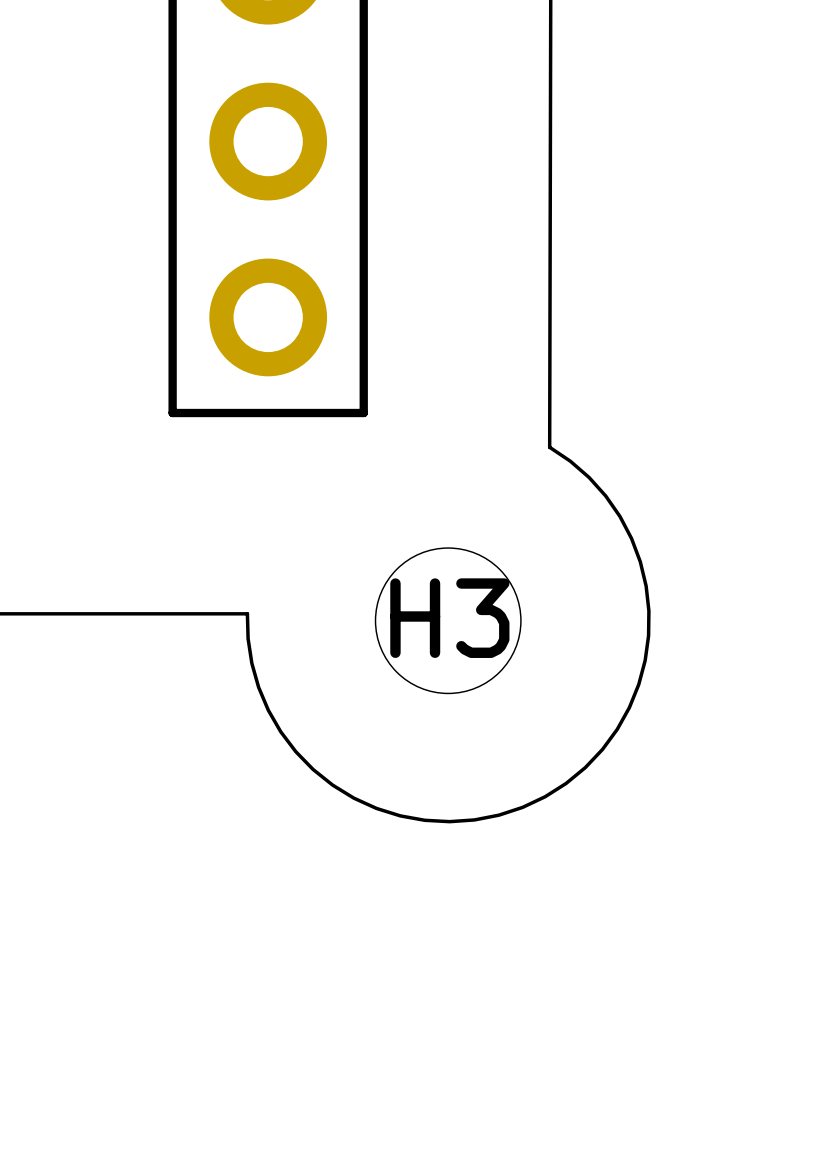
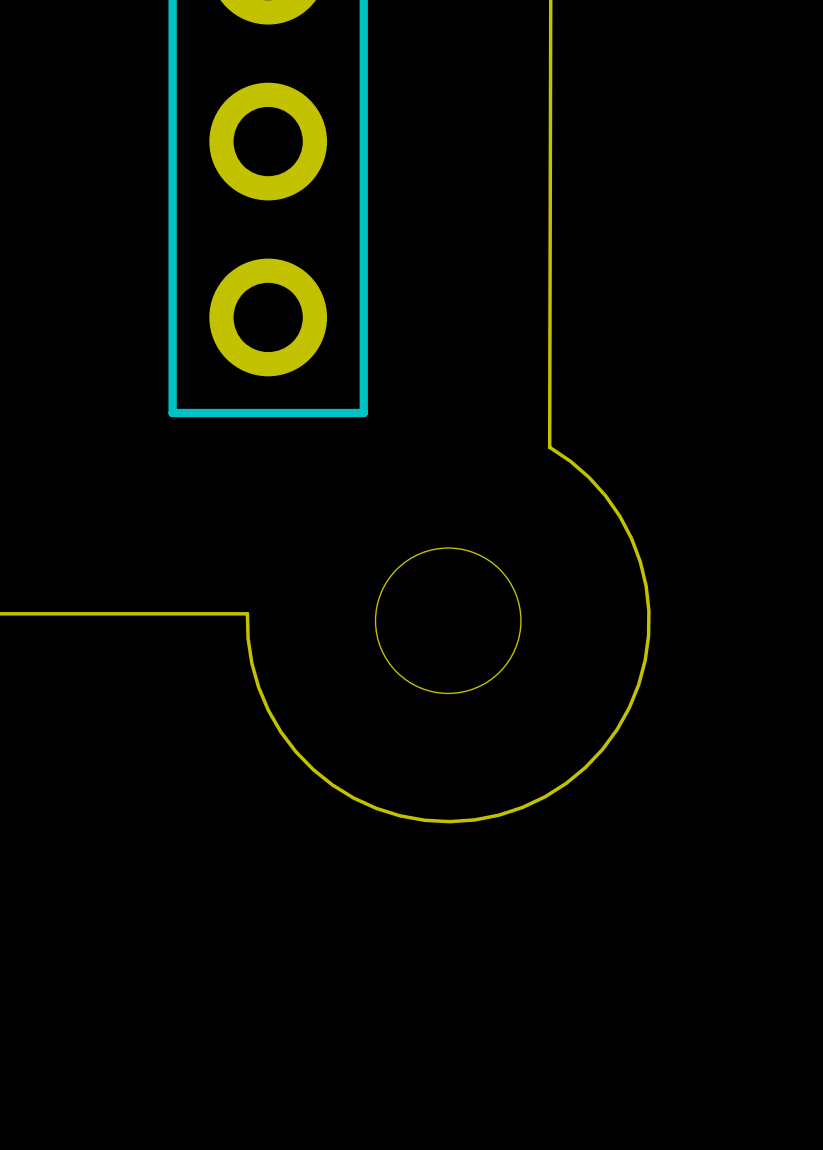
H3 name: H3 (449, 618) -> none

